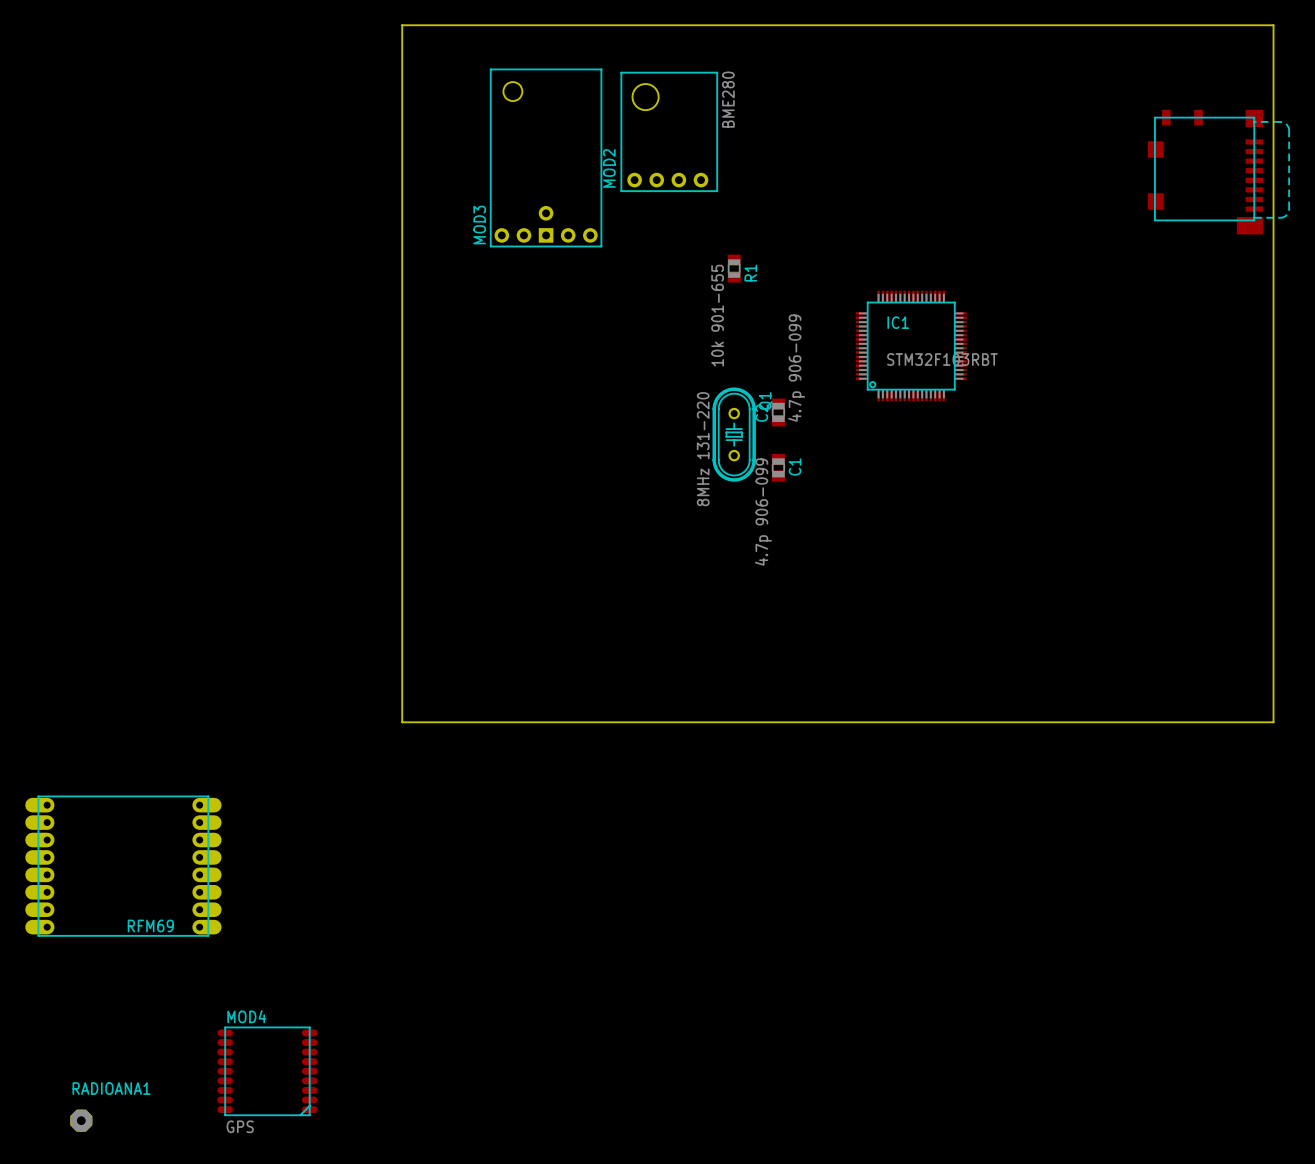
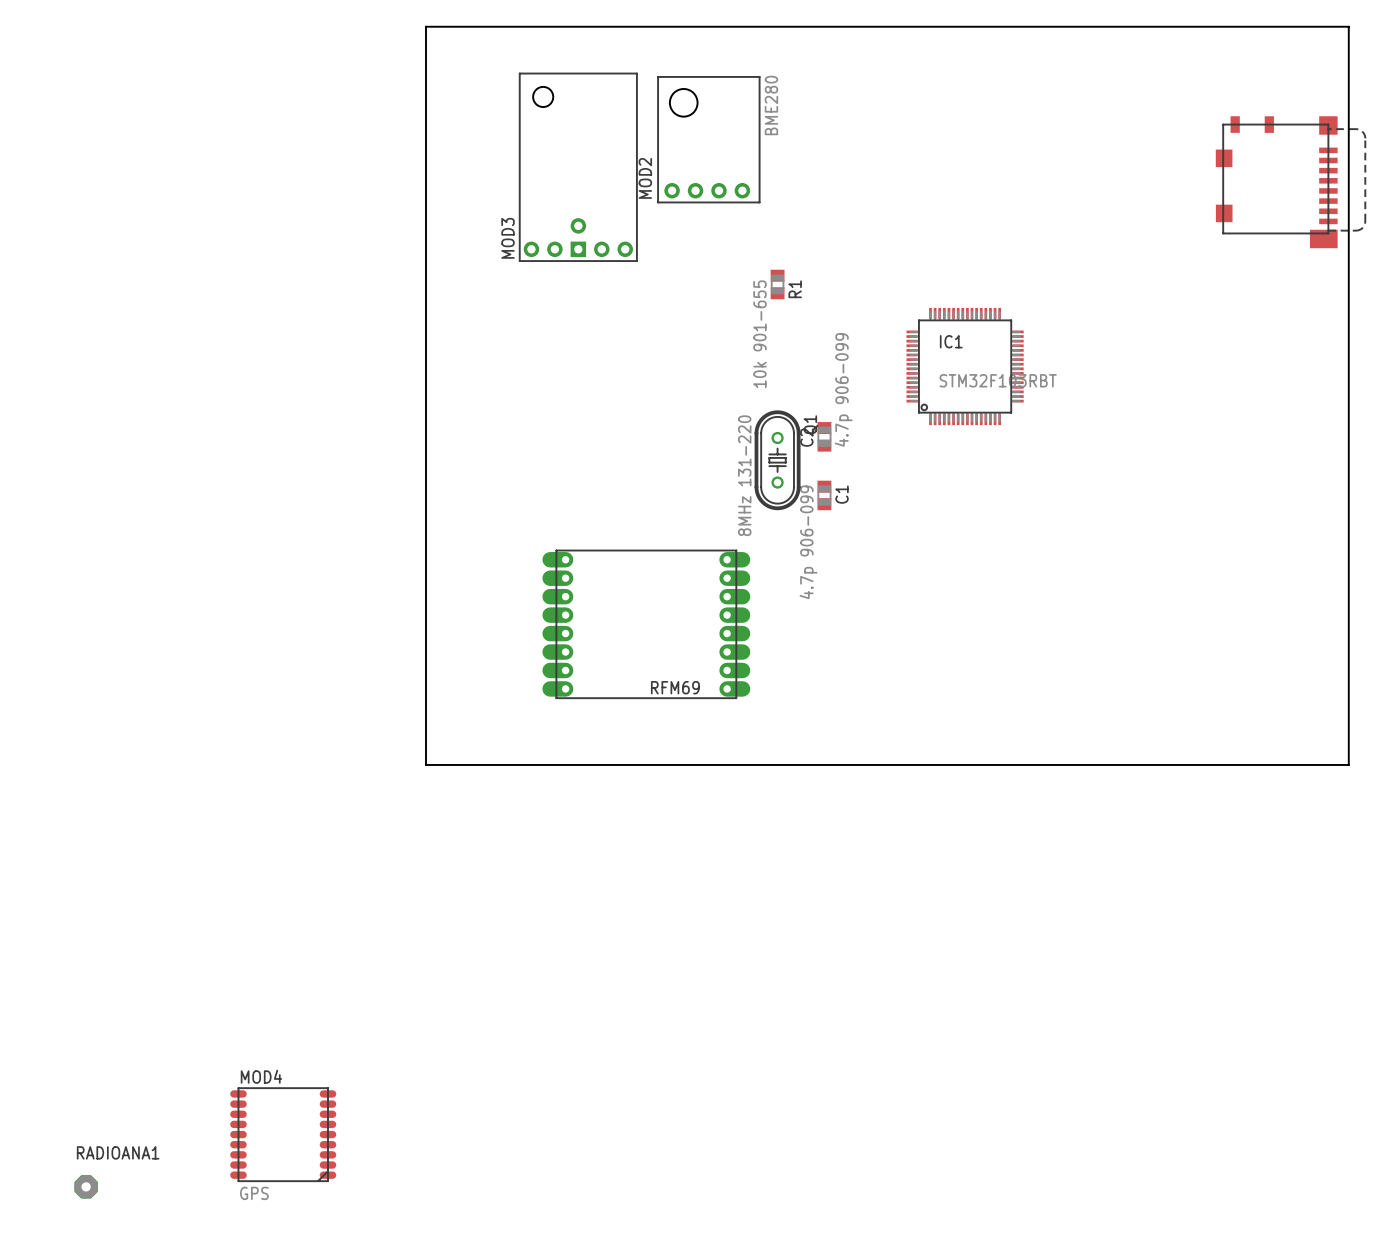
part: none -> (646, 624)
part: (123, 866) -> none

